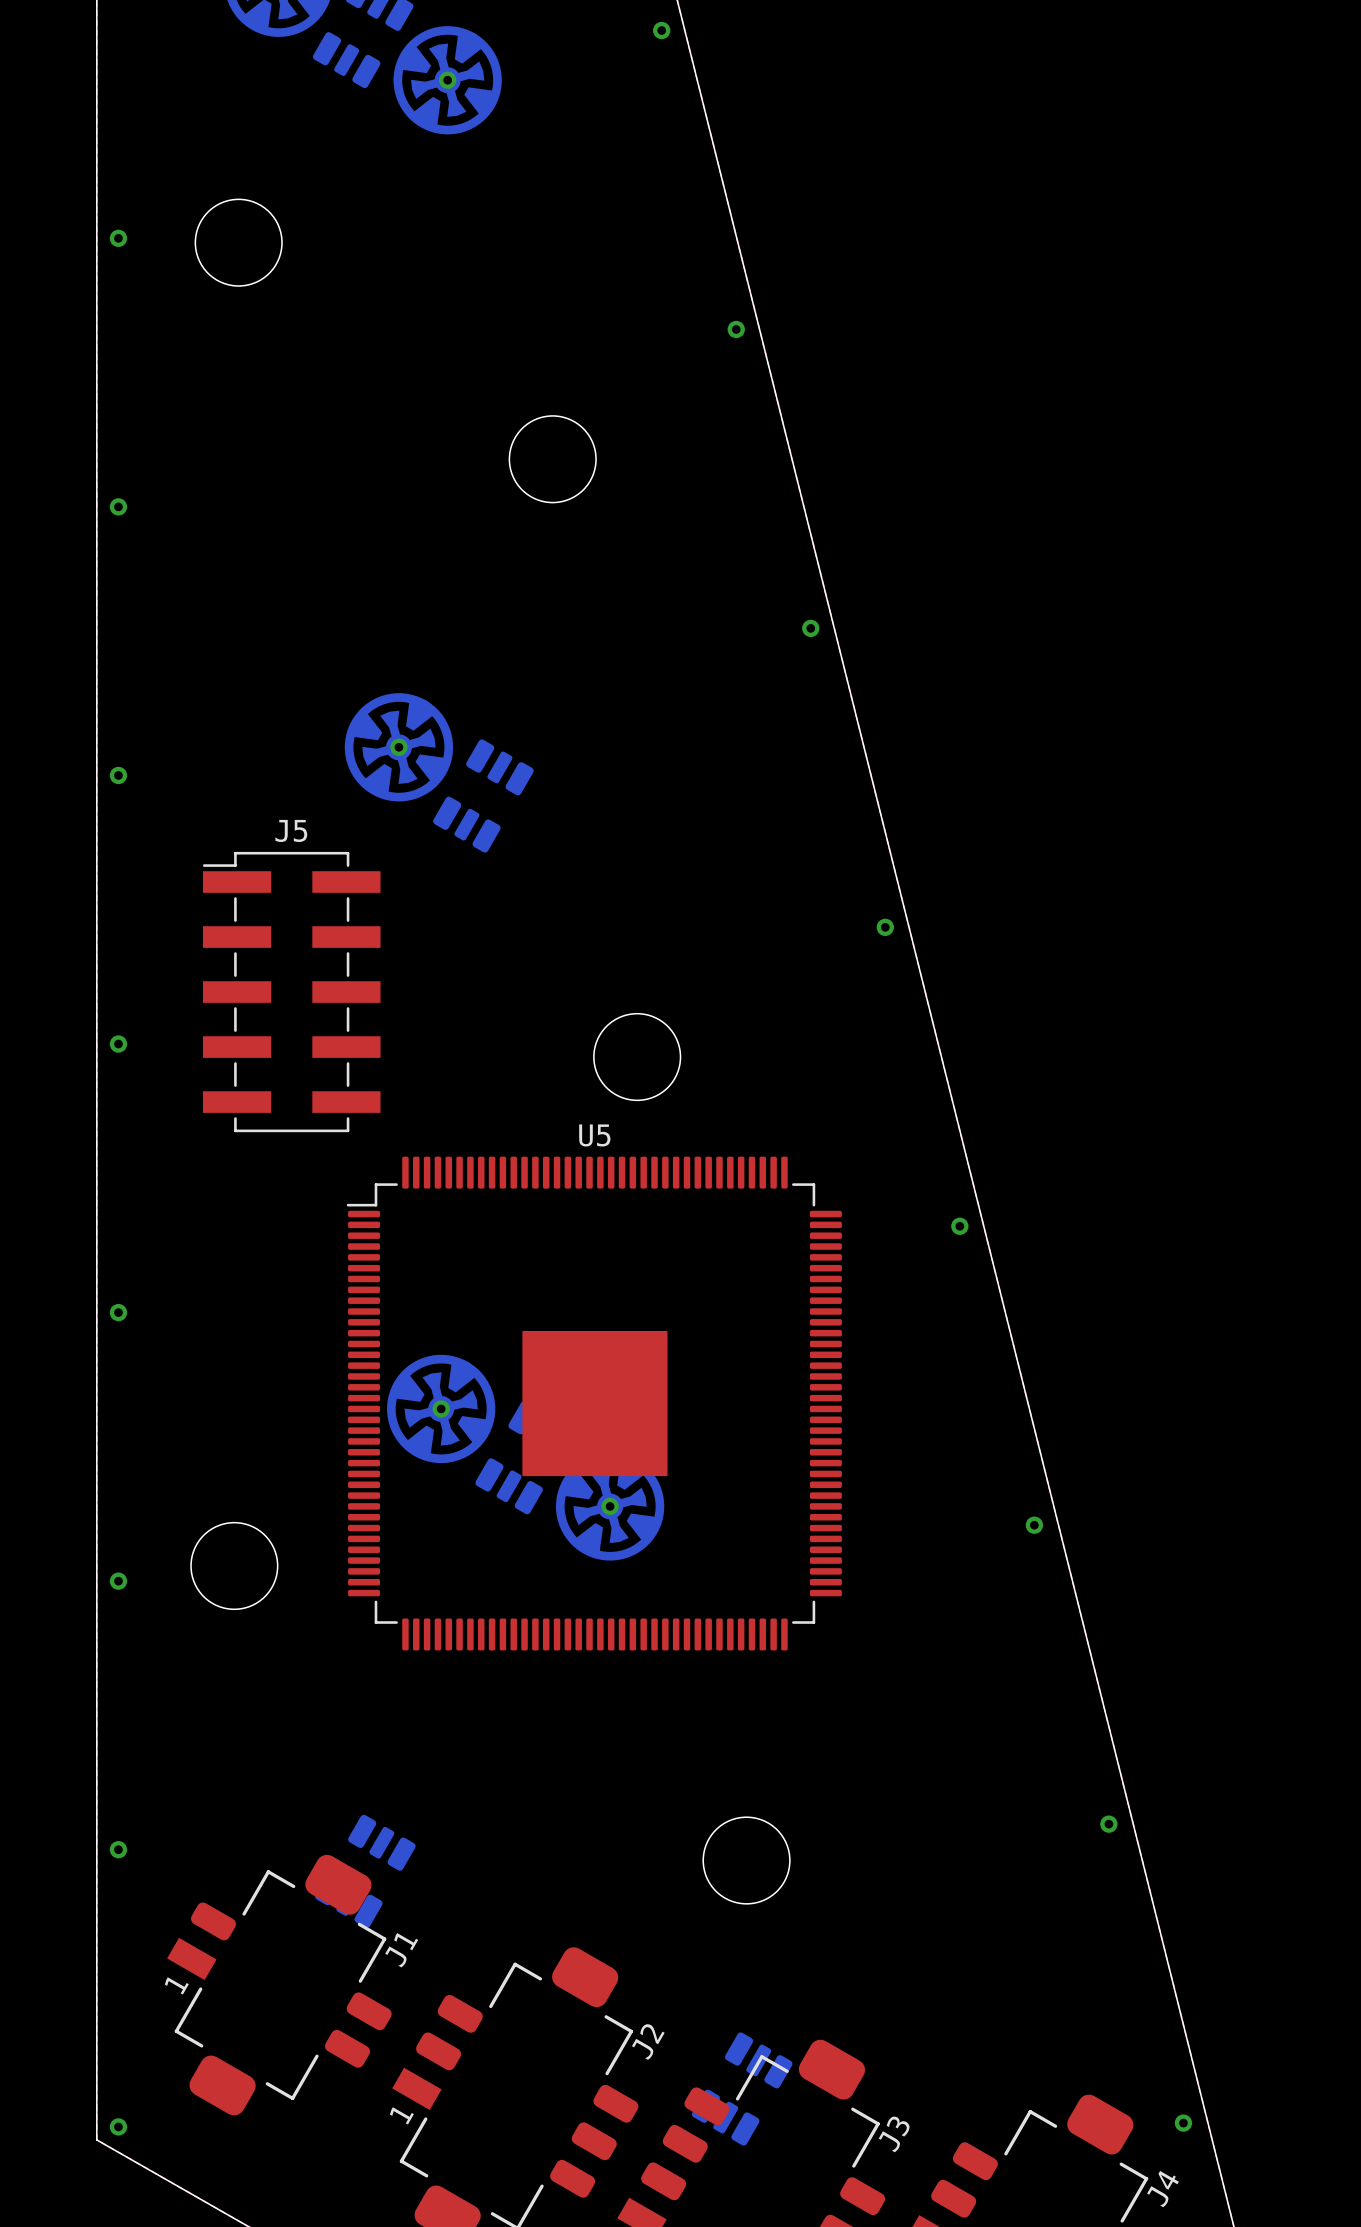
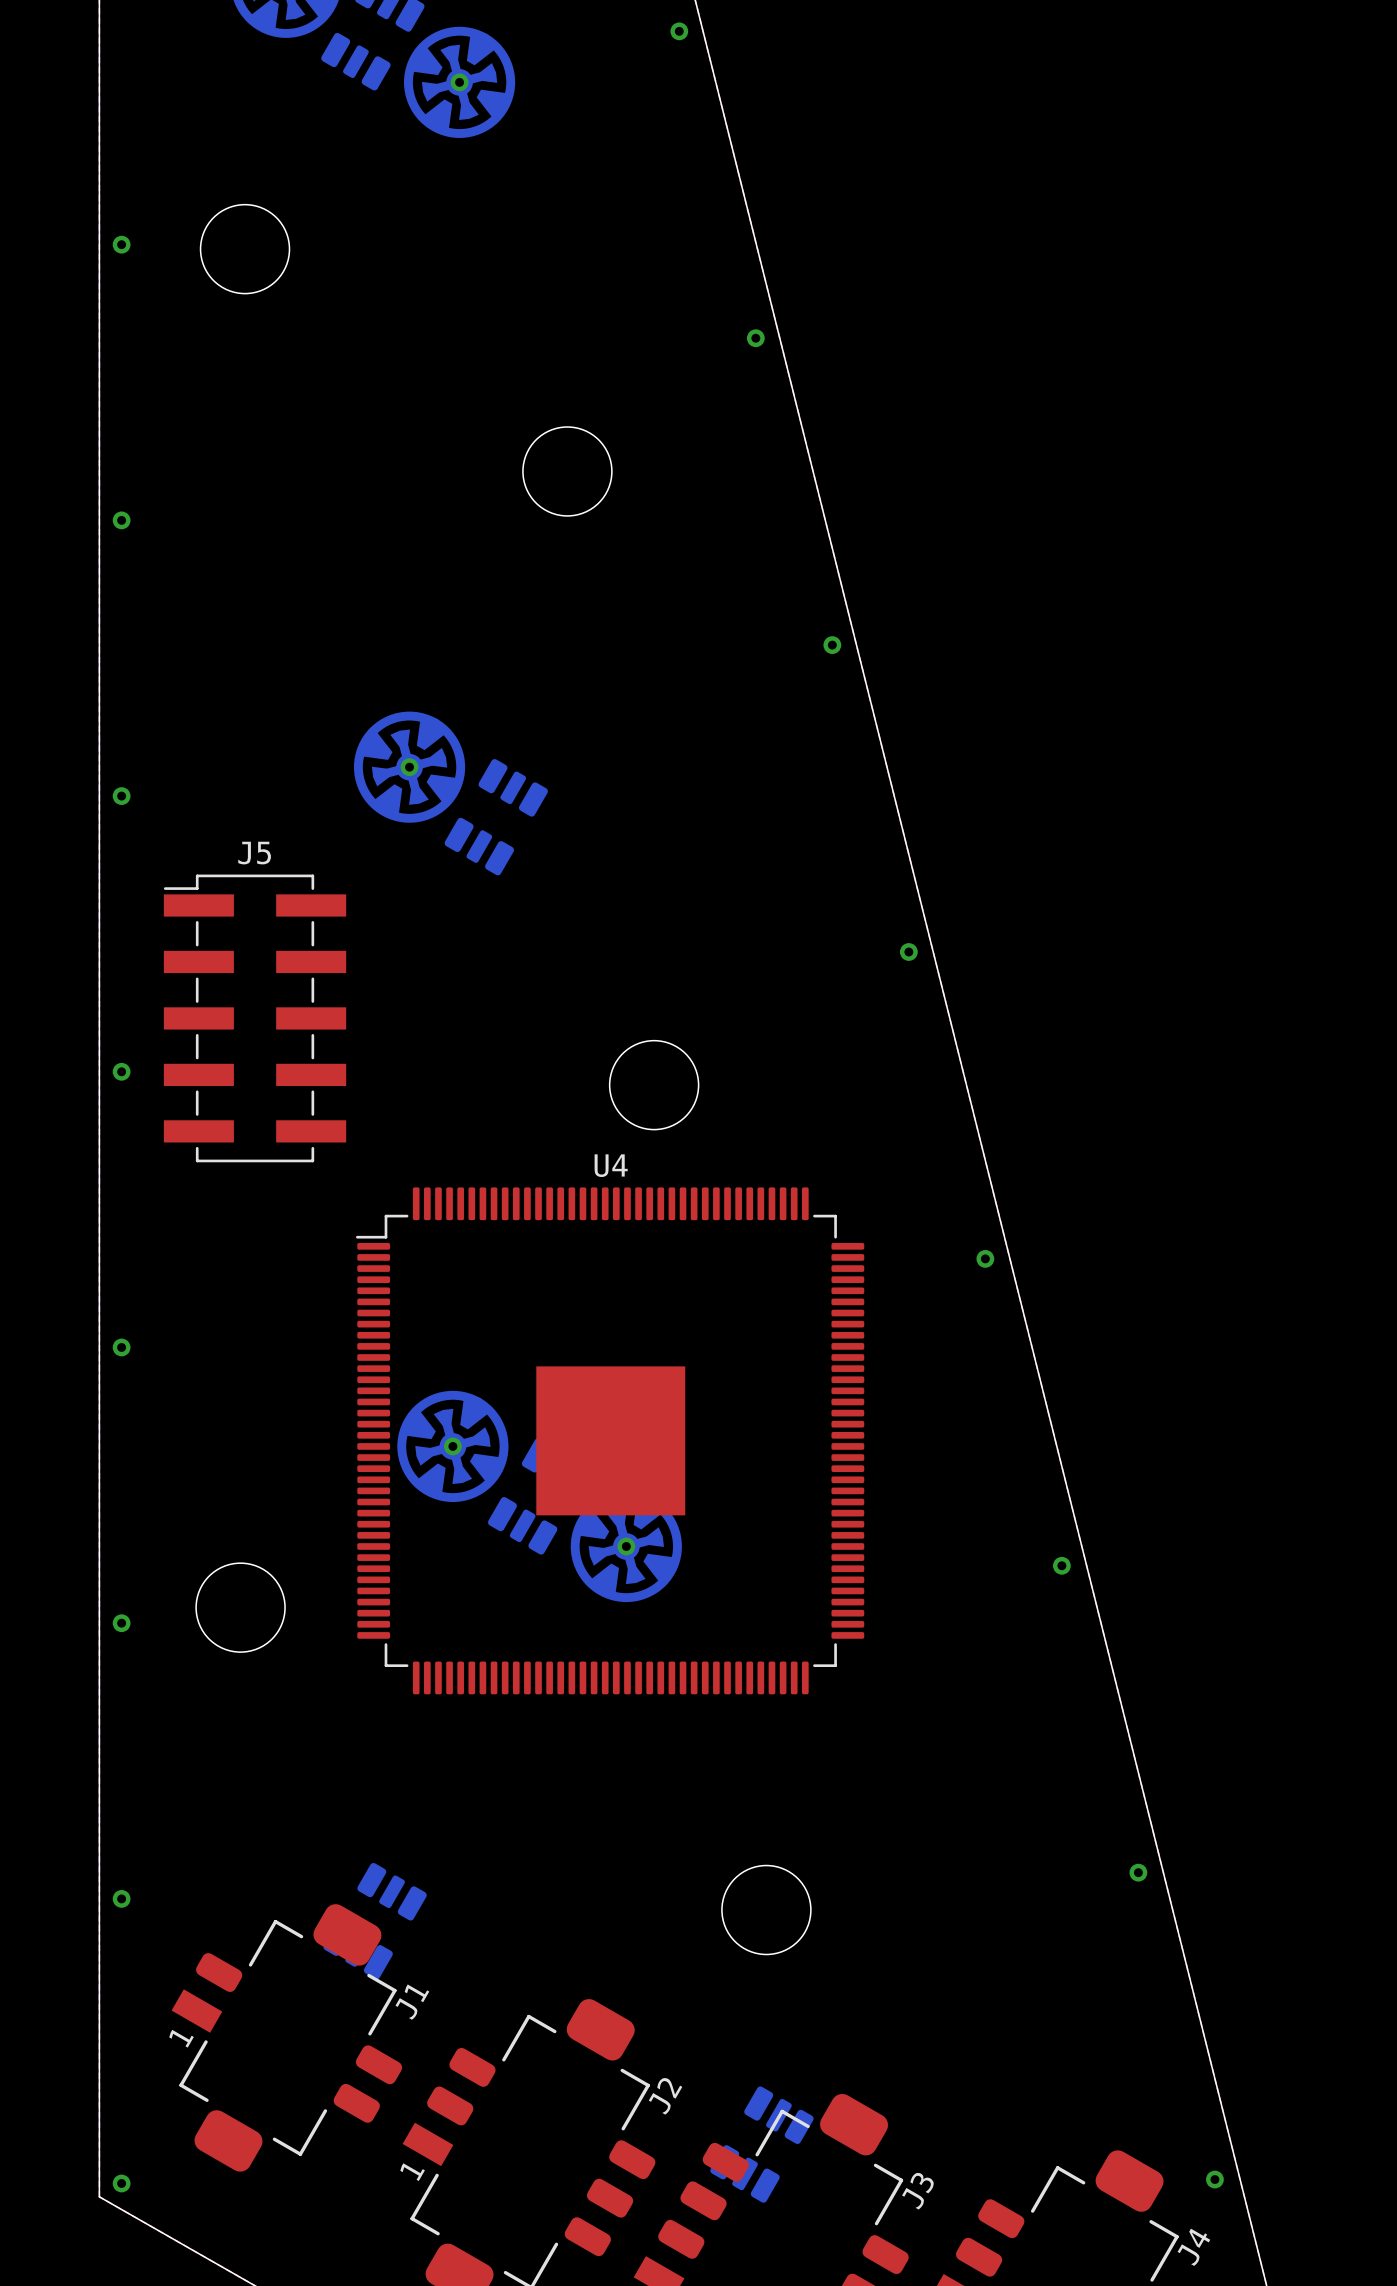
J5 position: (291, 992) -> (255, 1018)
U5 name: U5 (594, 1135) -> U4 (611, 1165)

